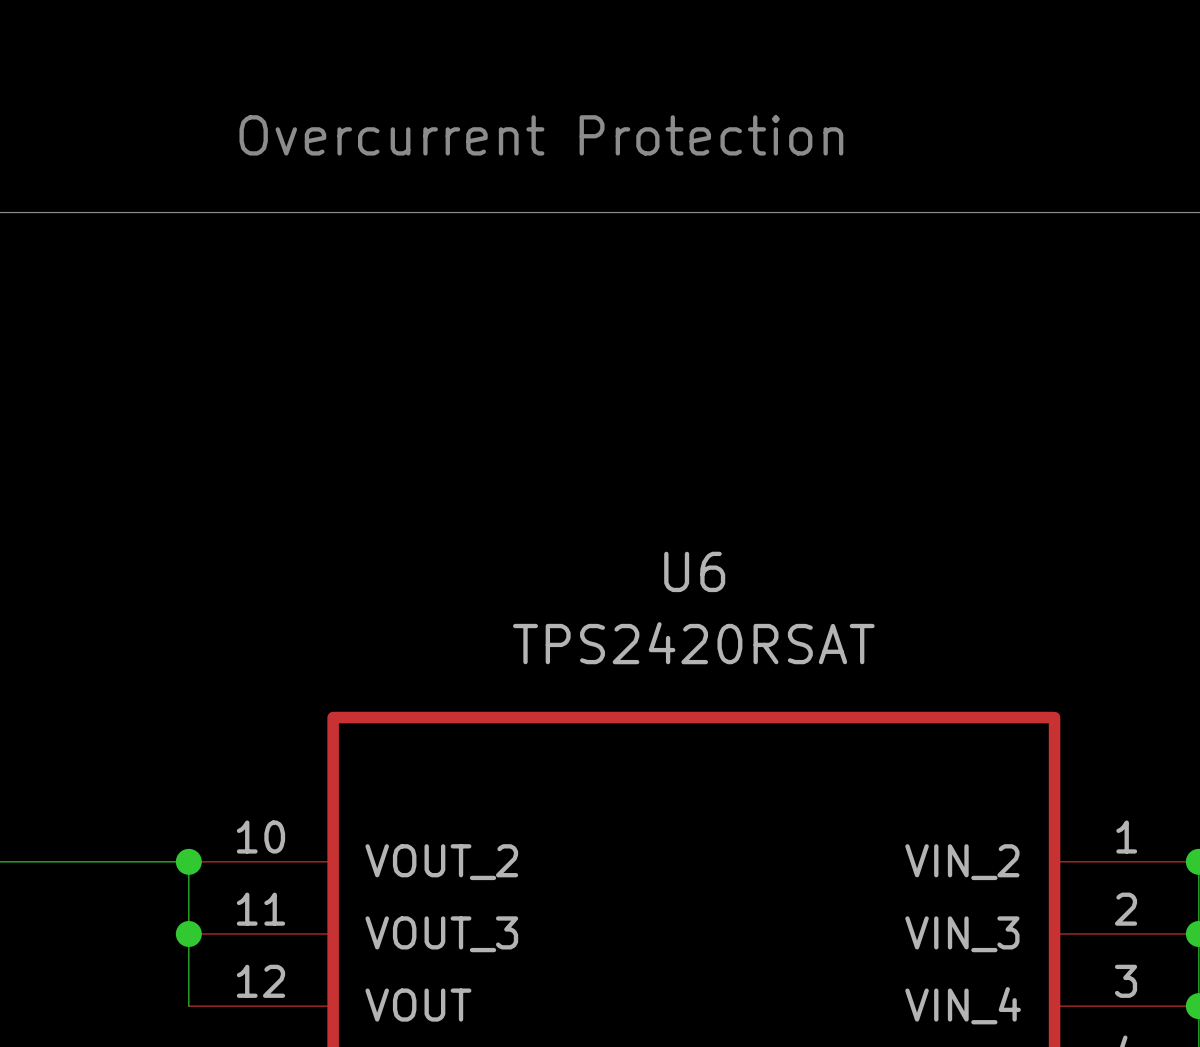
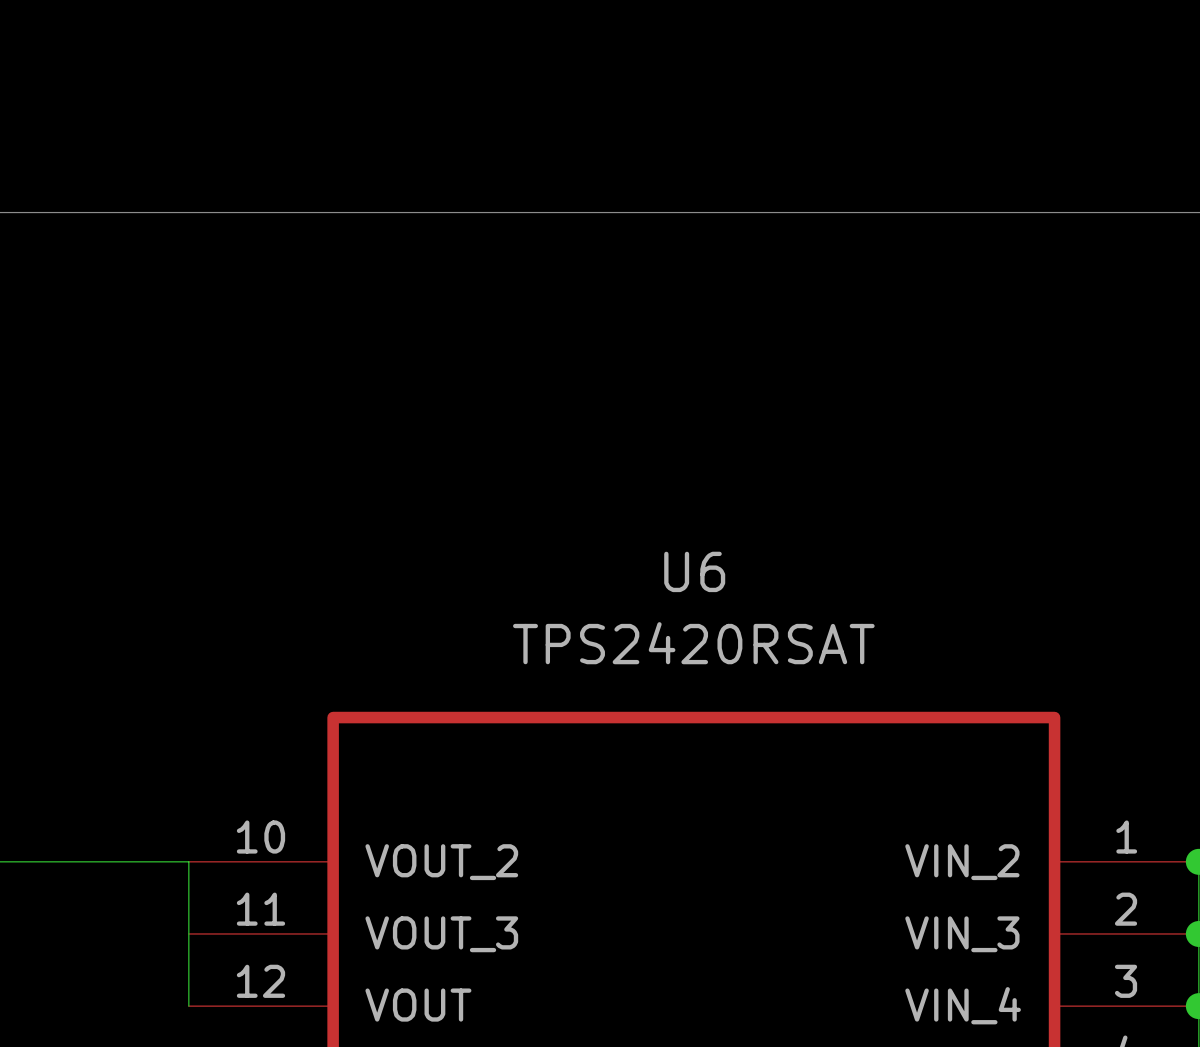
text: Overcurrent Protection (541, 135) -> none
junction: (188, 861) -> none
junction: (188, 933) -> none

